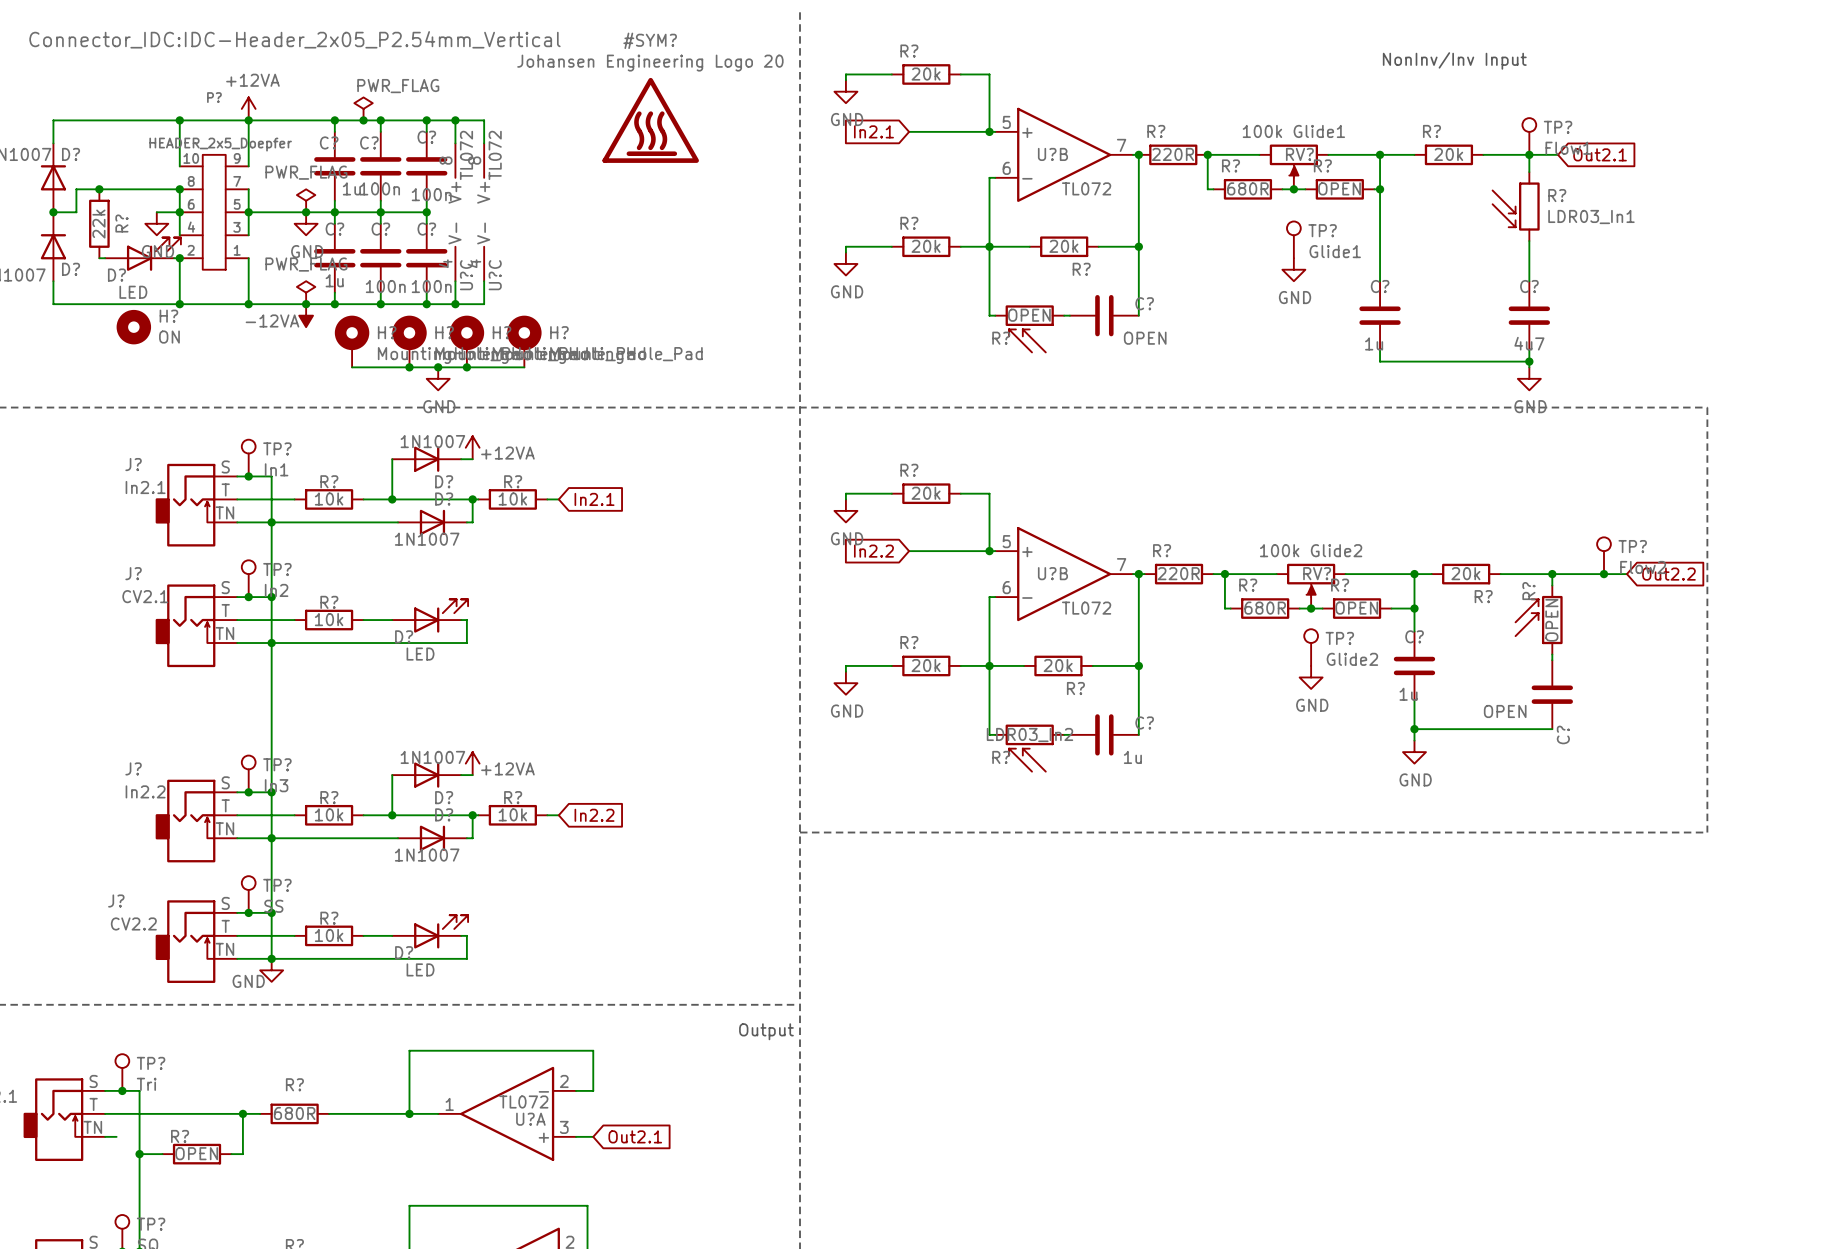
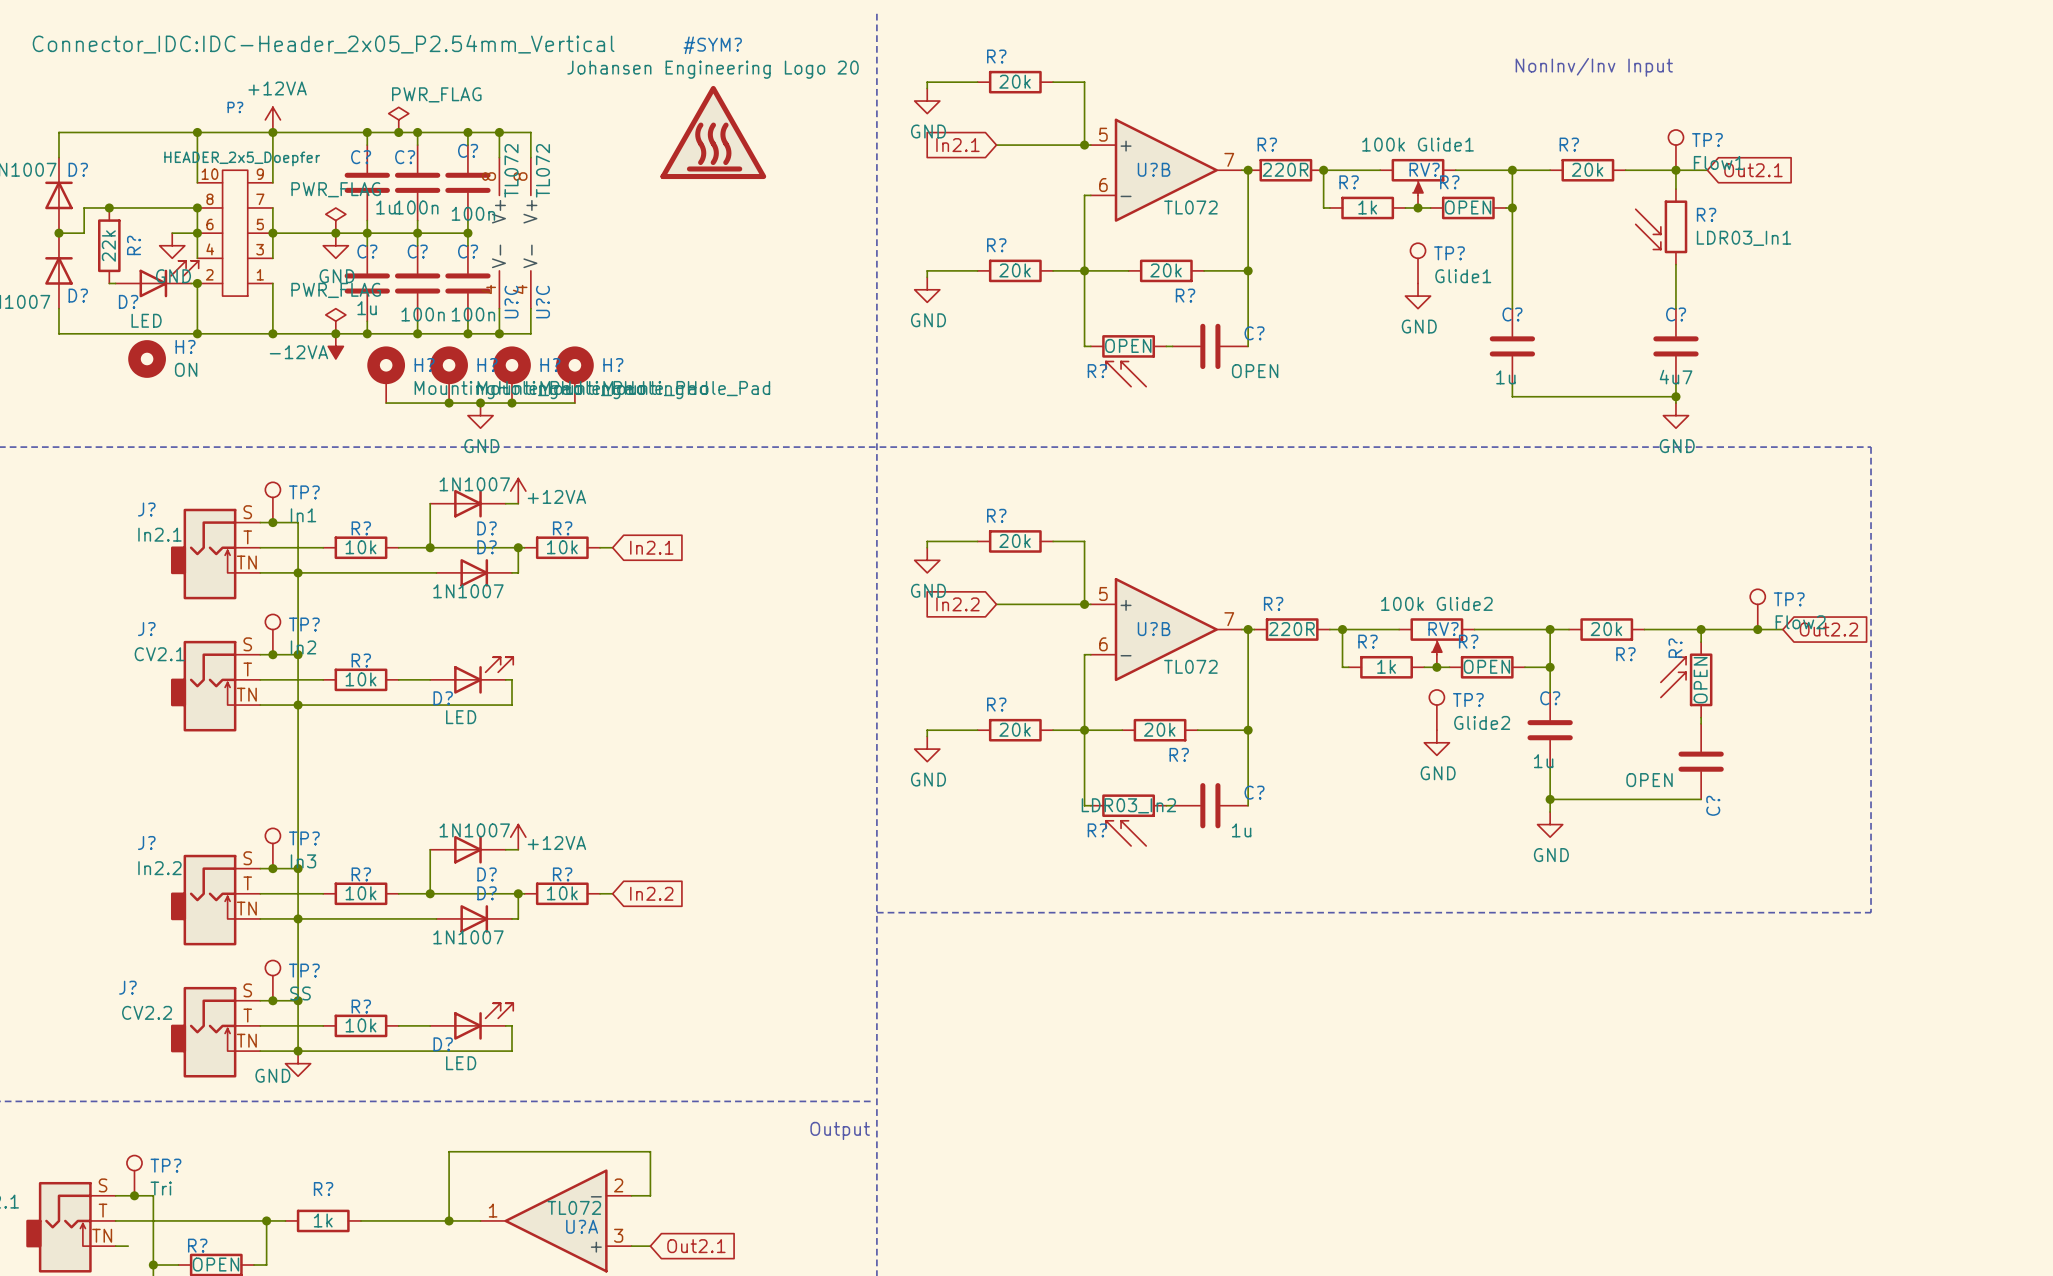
R? value: 680R (1247, 188) -> 1k (1367, 207)
R? value: 680R (1265, 608) -> 1k (1386, 666)
R? value: 680R (294, 1113) -> 1k (323, 1220)

